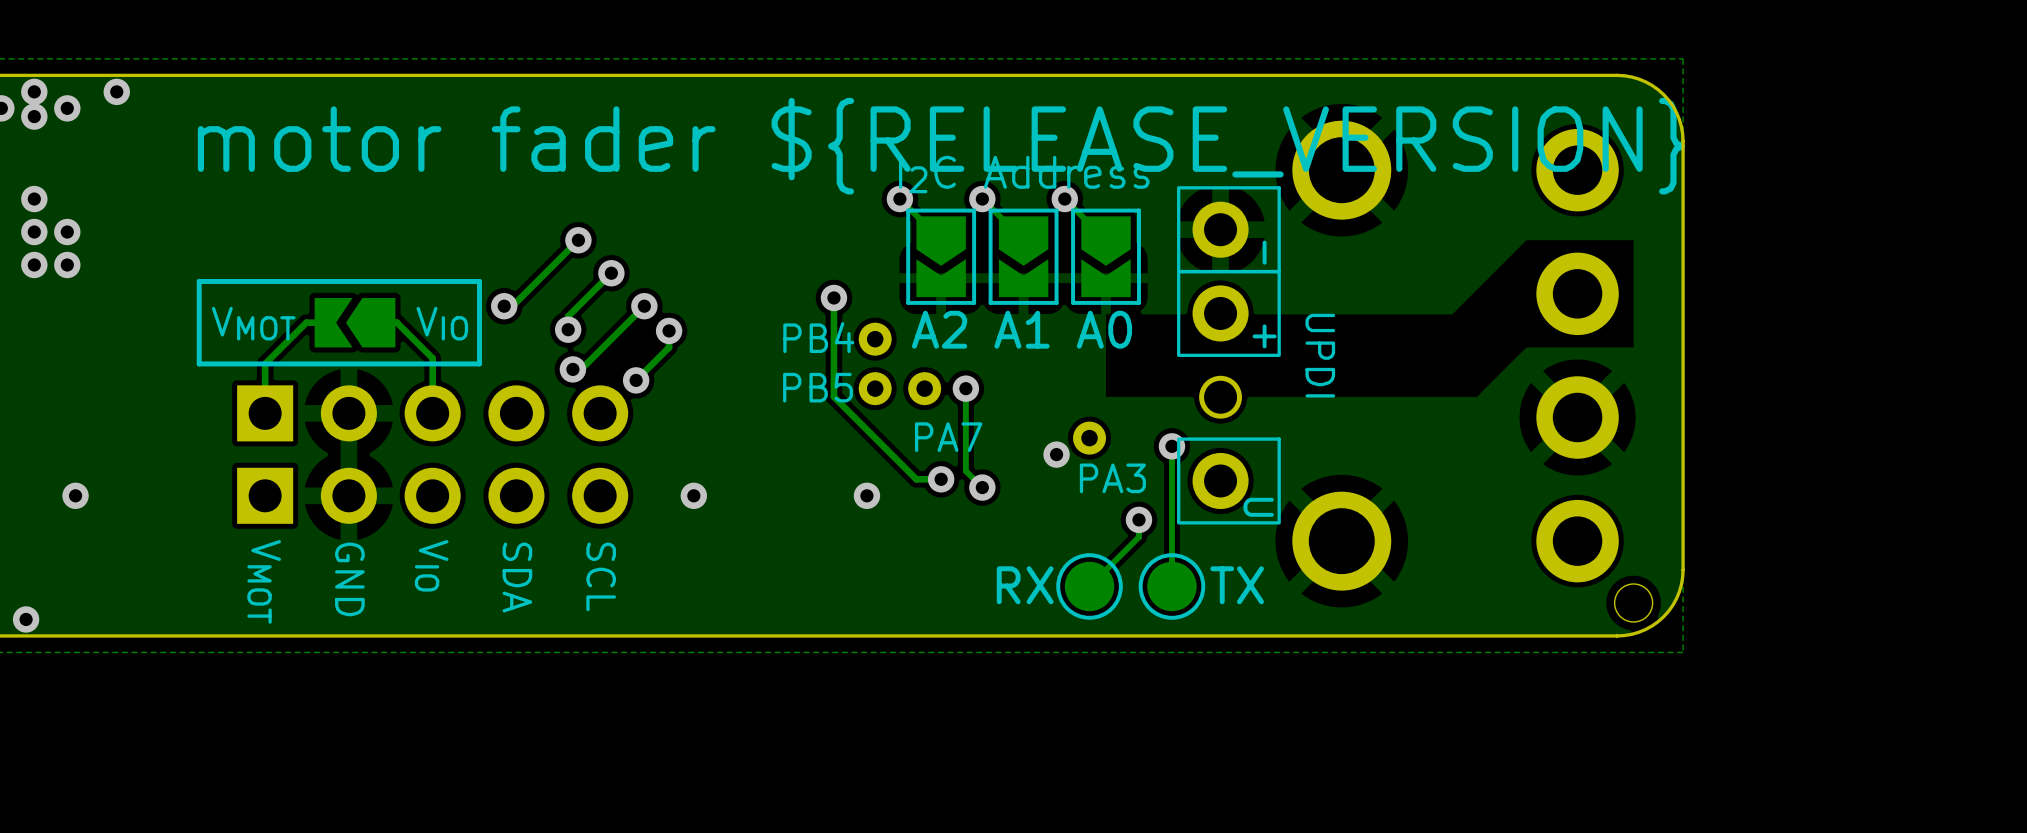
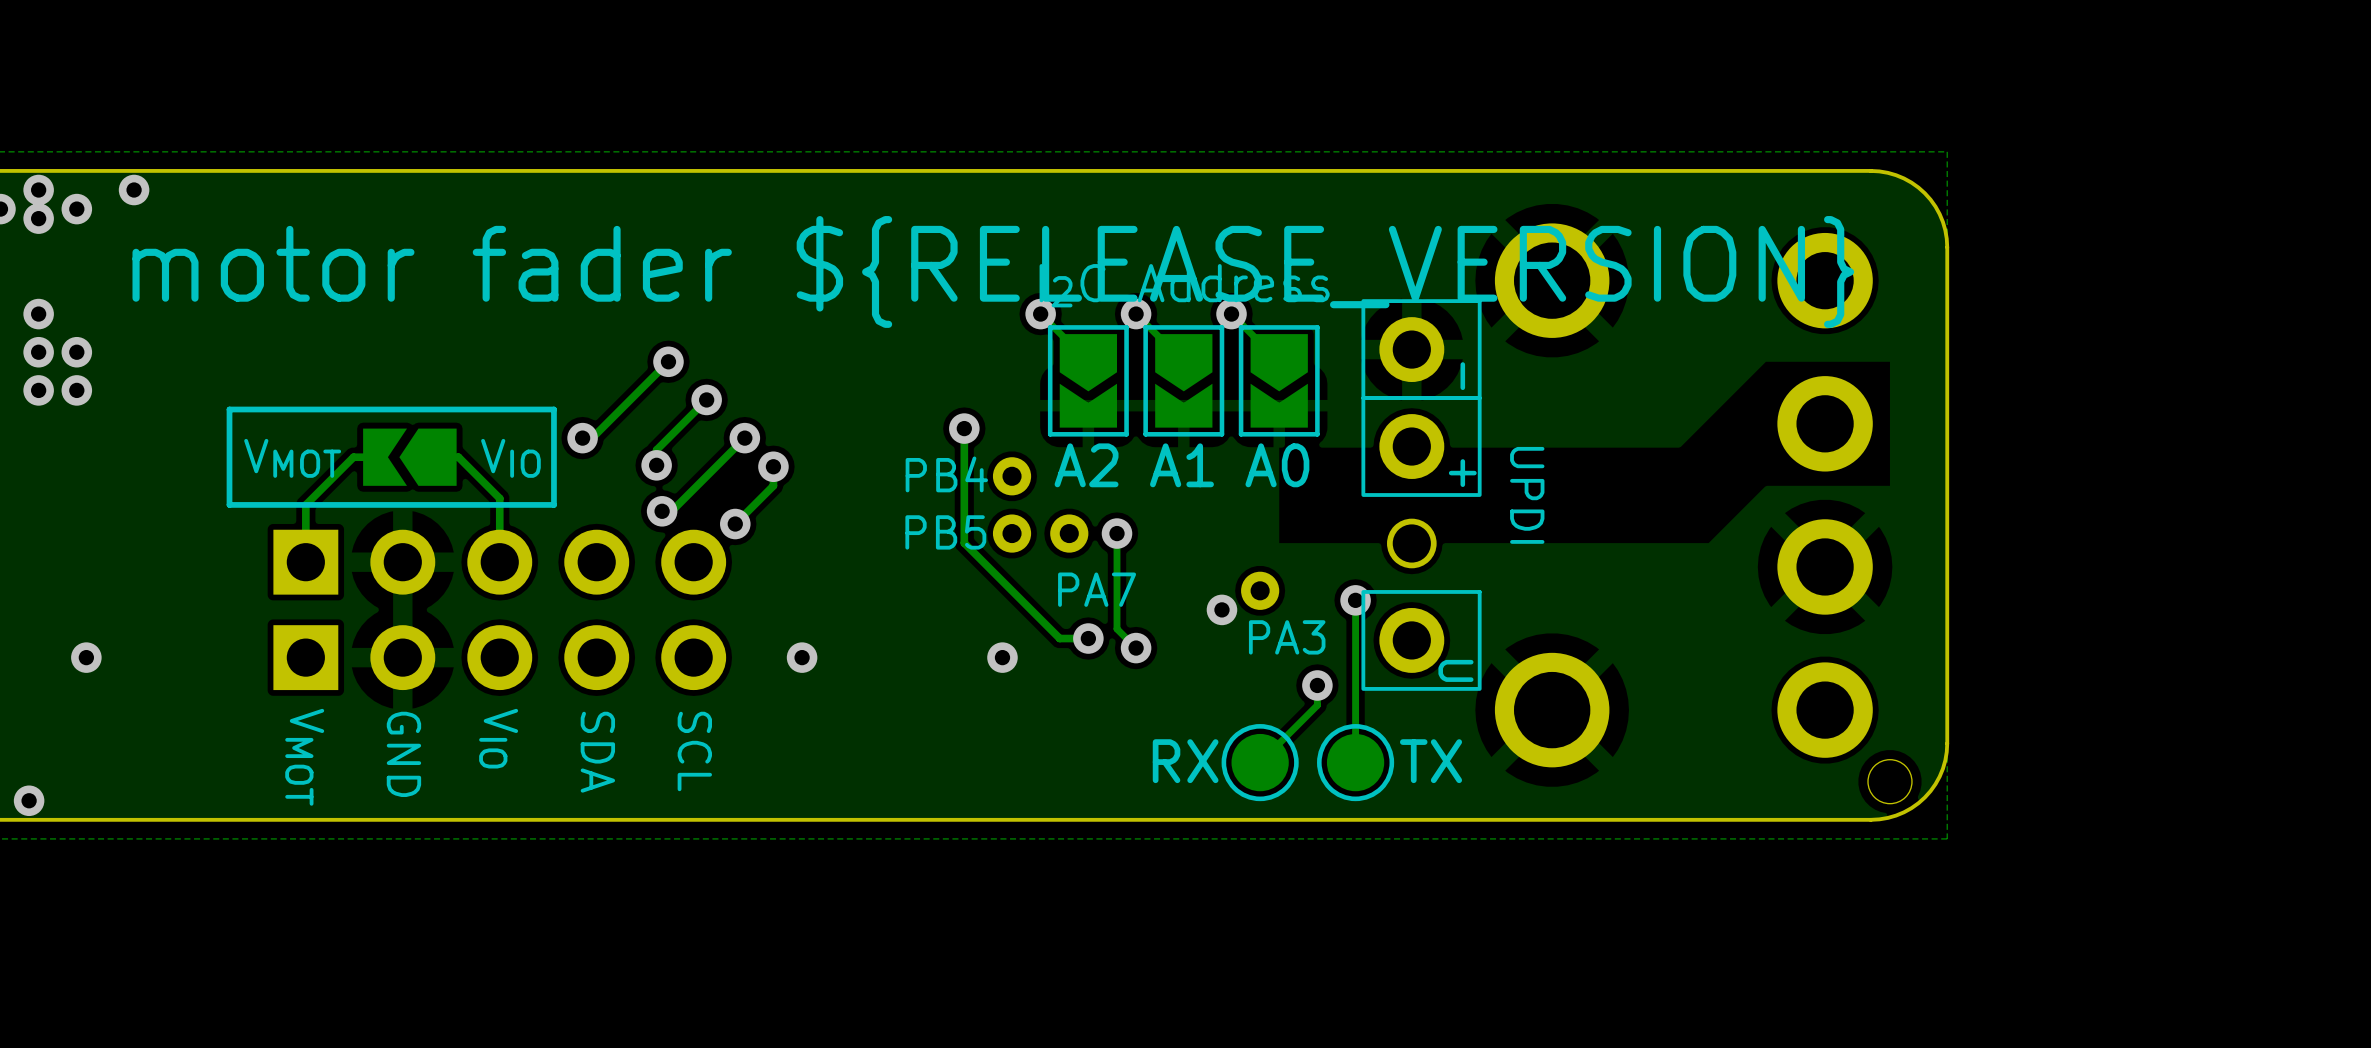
text position: motor fader ${RELEASE_VERSION} (941, 146) -> motor fader ${RELEASE_VERSION} (993, 271)

